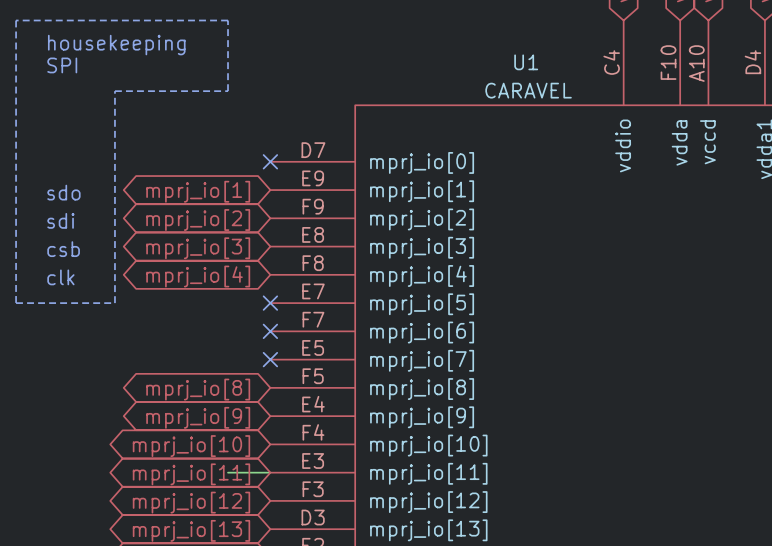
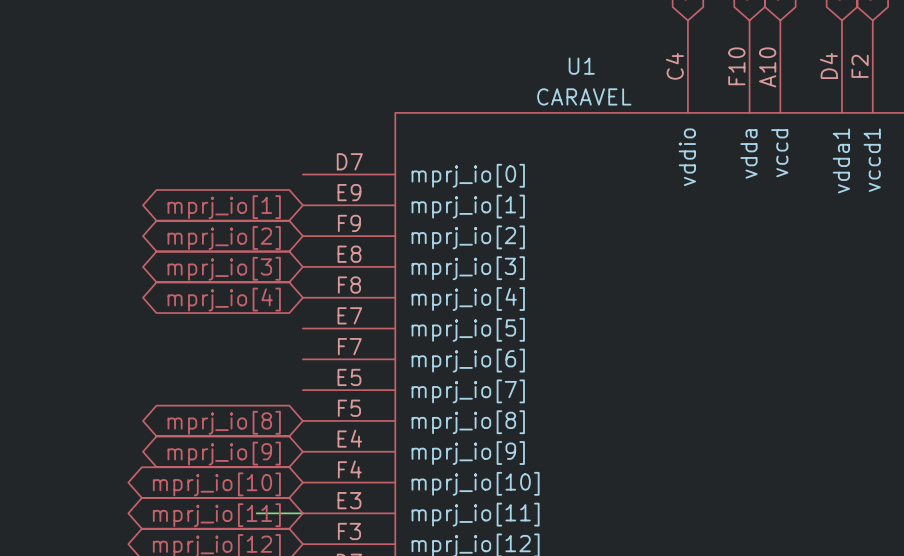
line: (16, 20) (228, 20) (228, 91) (114, 91) (114, 303) (16, 303) (16, 20) -> none
text: housekeeping (116, 45) -> none
text: SPI (62, 65) -> none
no-connect mark: (270, 161) -> none
text: sdo (63, 192) -> none
text: sdi (60, 220) -> none
text: csb (63, 249) -> none
text: clk (60, 277) -> none
no-connect mark: (270, 303) -> none
no-connect mark: (270, 331) -> none
no-connect mark: (270, 359) -> none

